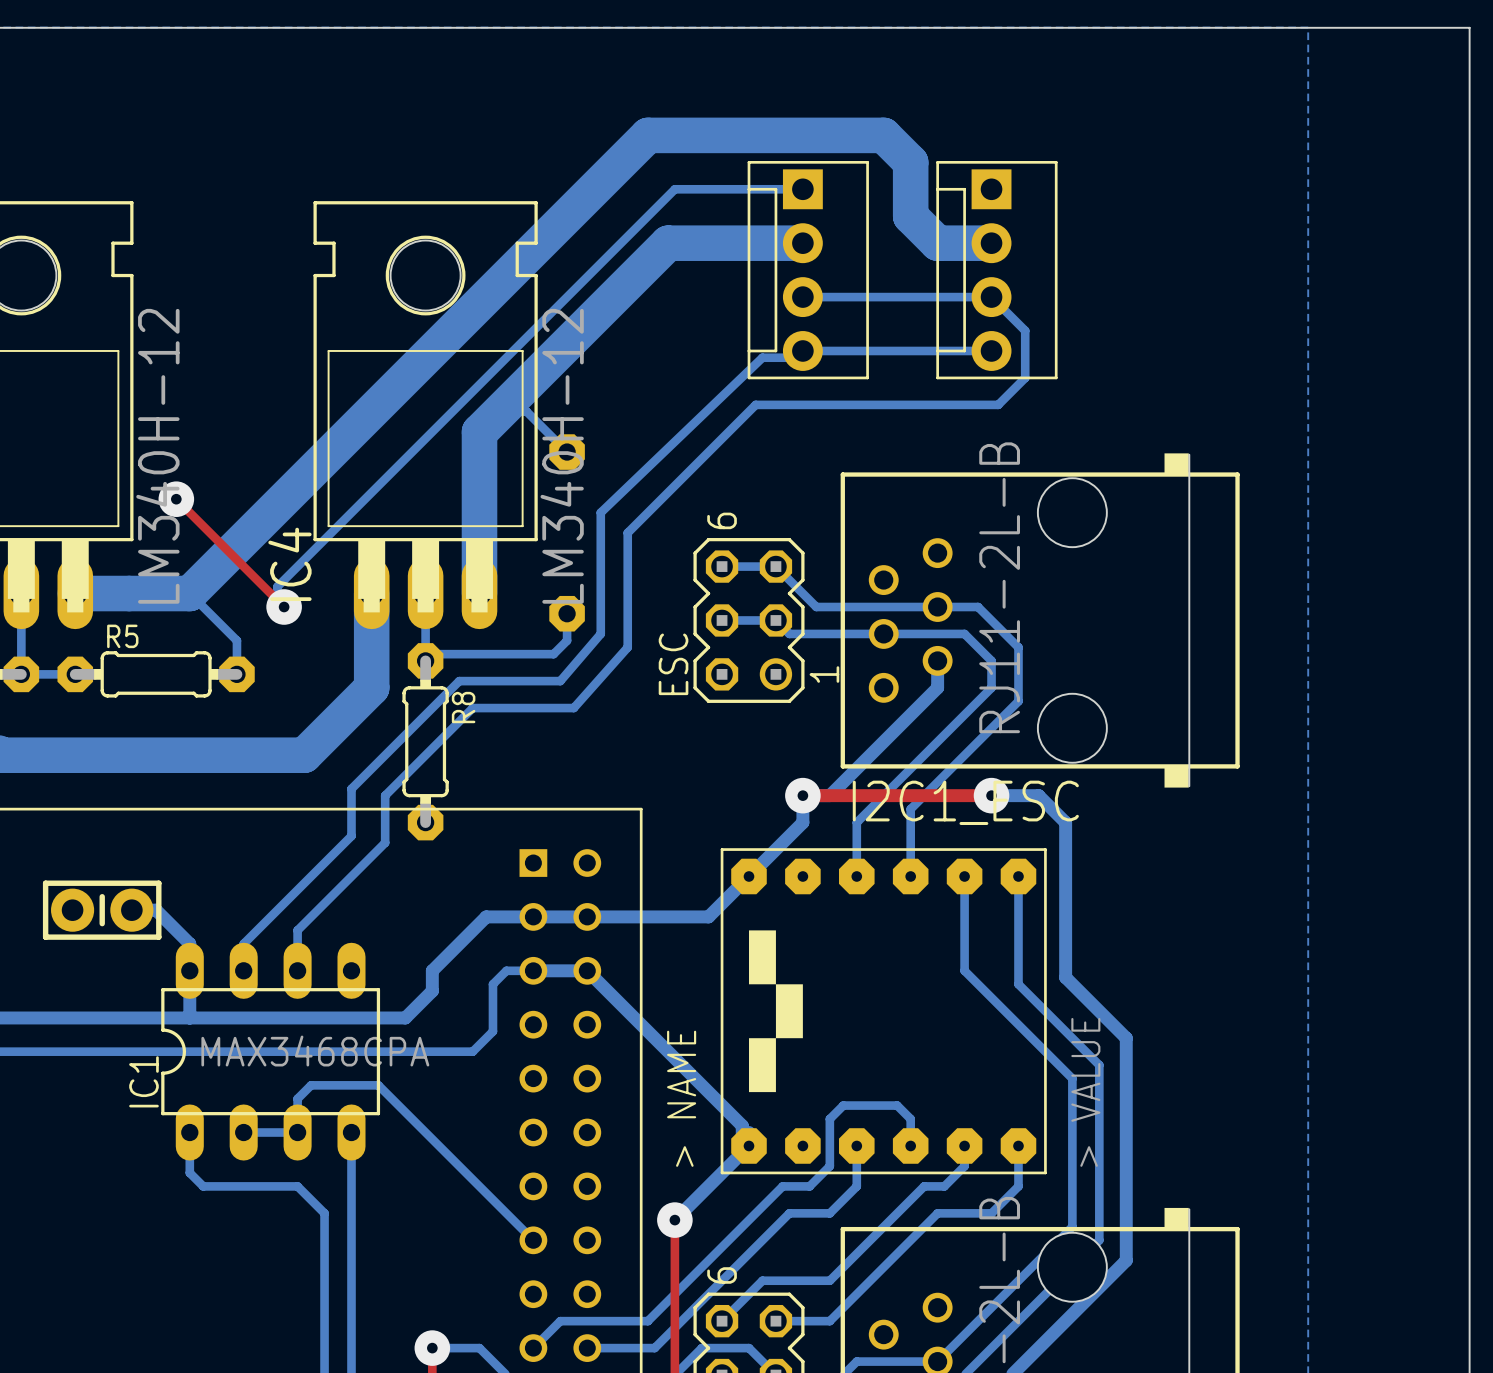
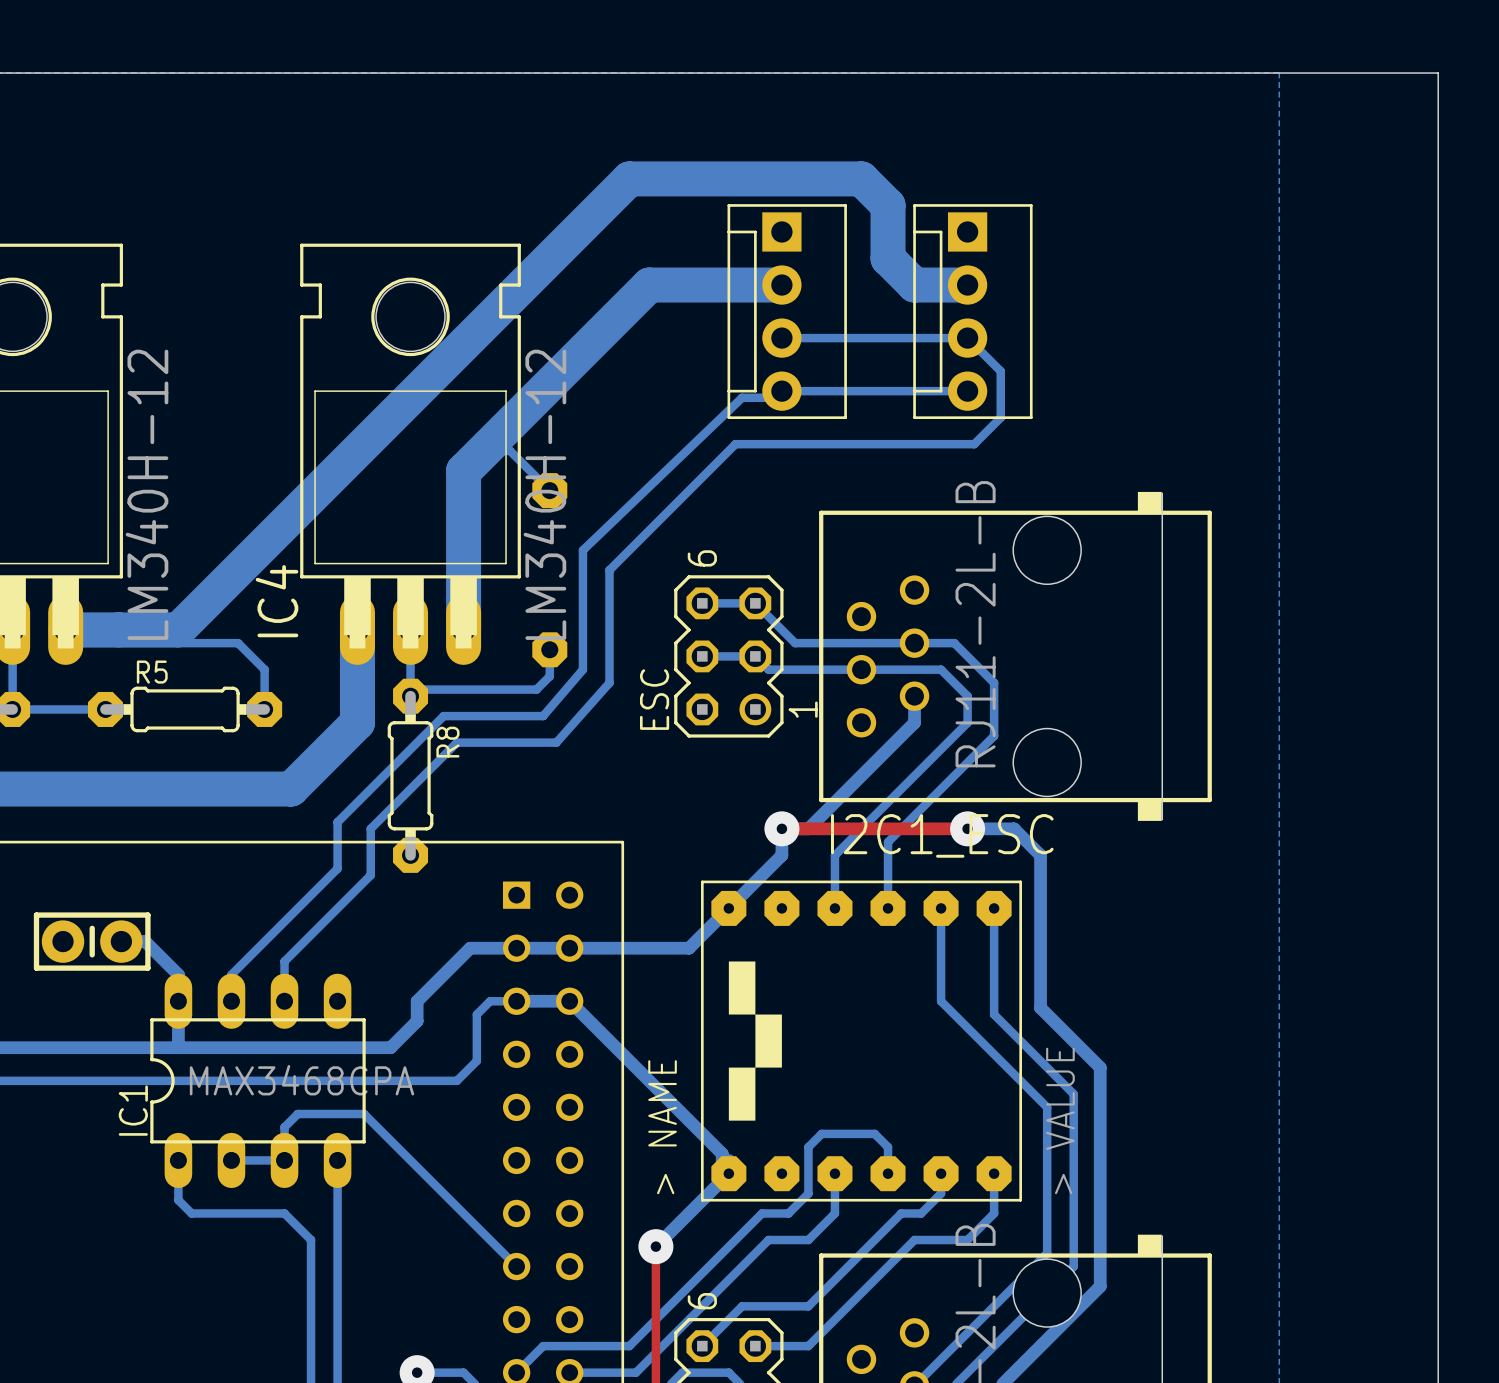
bottom track: (802, 189) (674, 189) (277, 586) (277, 600) (284, 607) -> none
top track: (176, 499) (284, 607) -> none
via: (176, 499) -> none
bottom track: (189, 593) (236, 640) (236, 674) -> none
bottom track: none -> (78, 643) (238, 643) (264, 669) (264, 709)
via: (284, 607) -> none
bottom track: none -> (65, 709) (105, 709)
R5 position: (156, 674) -> (185, 709)

